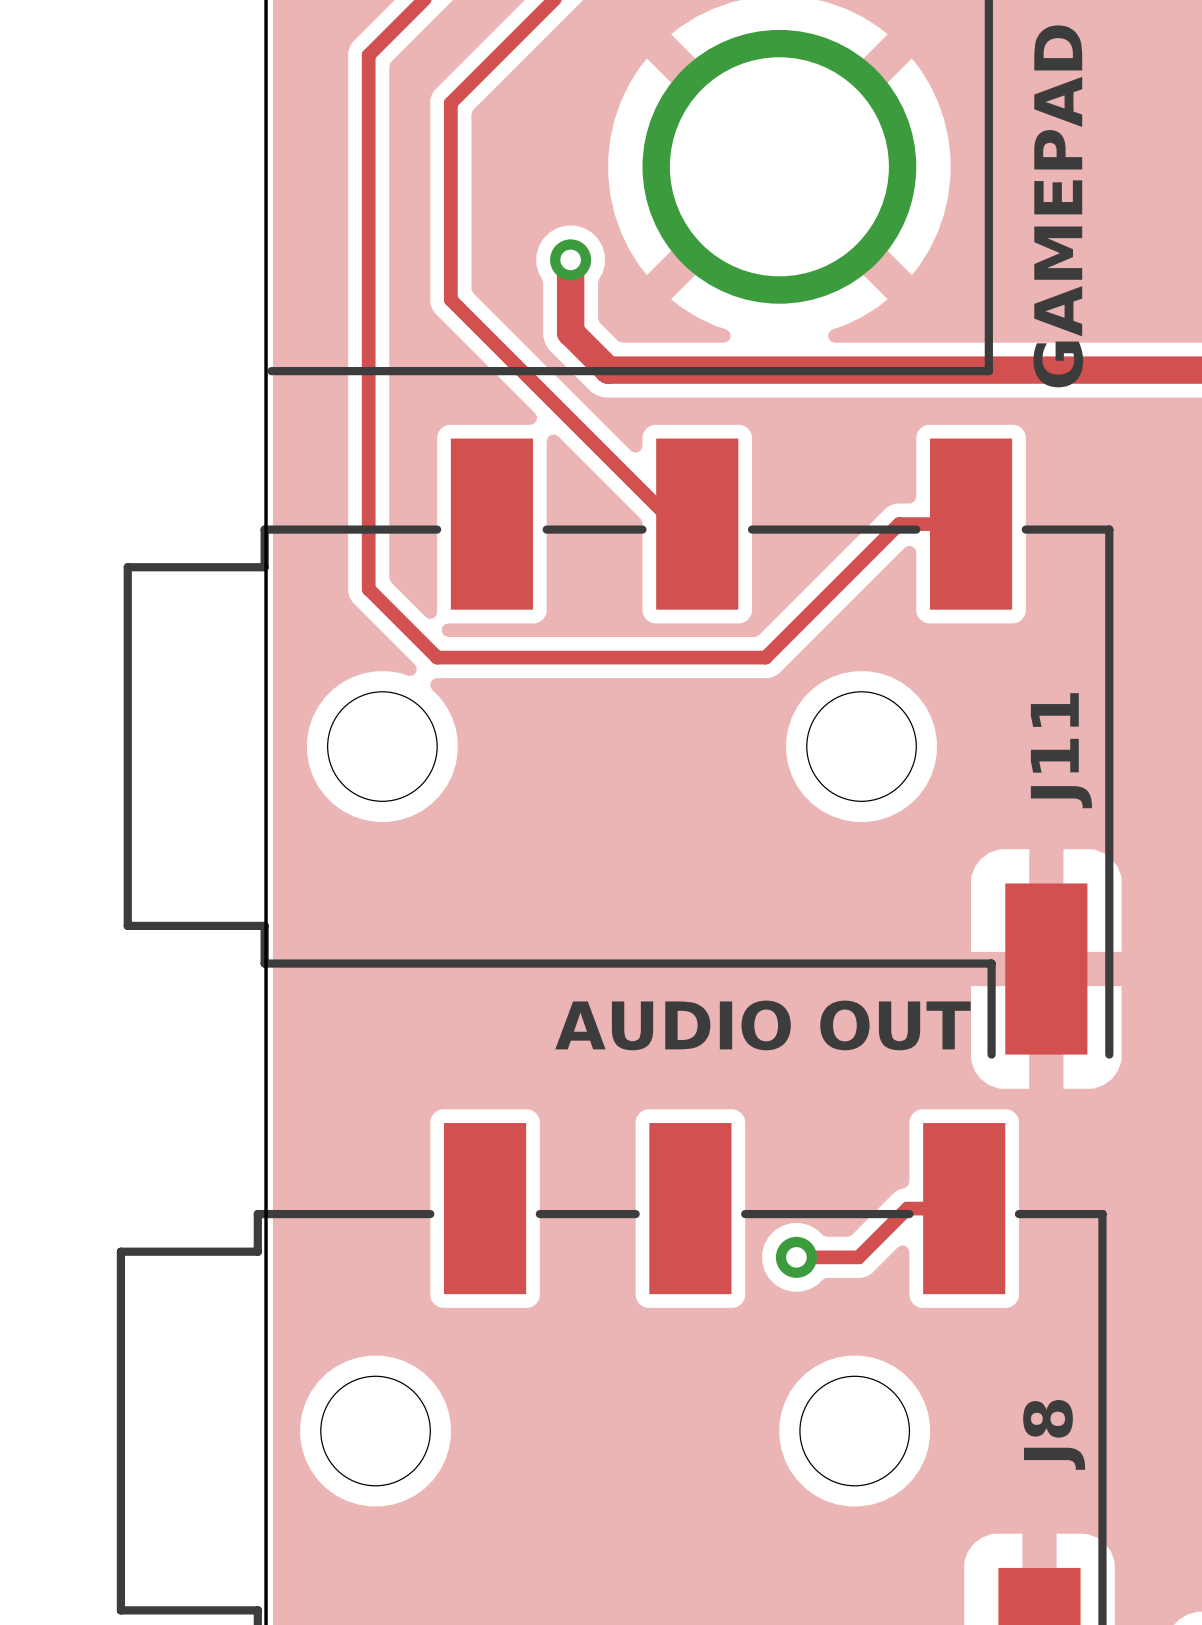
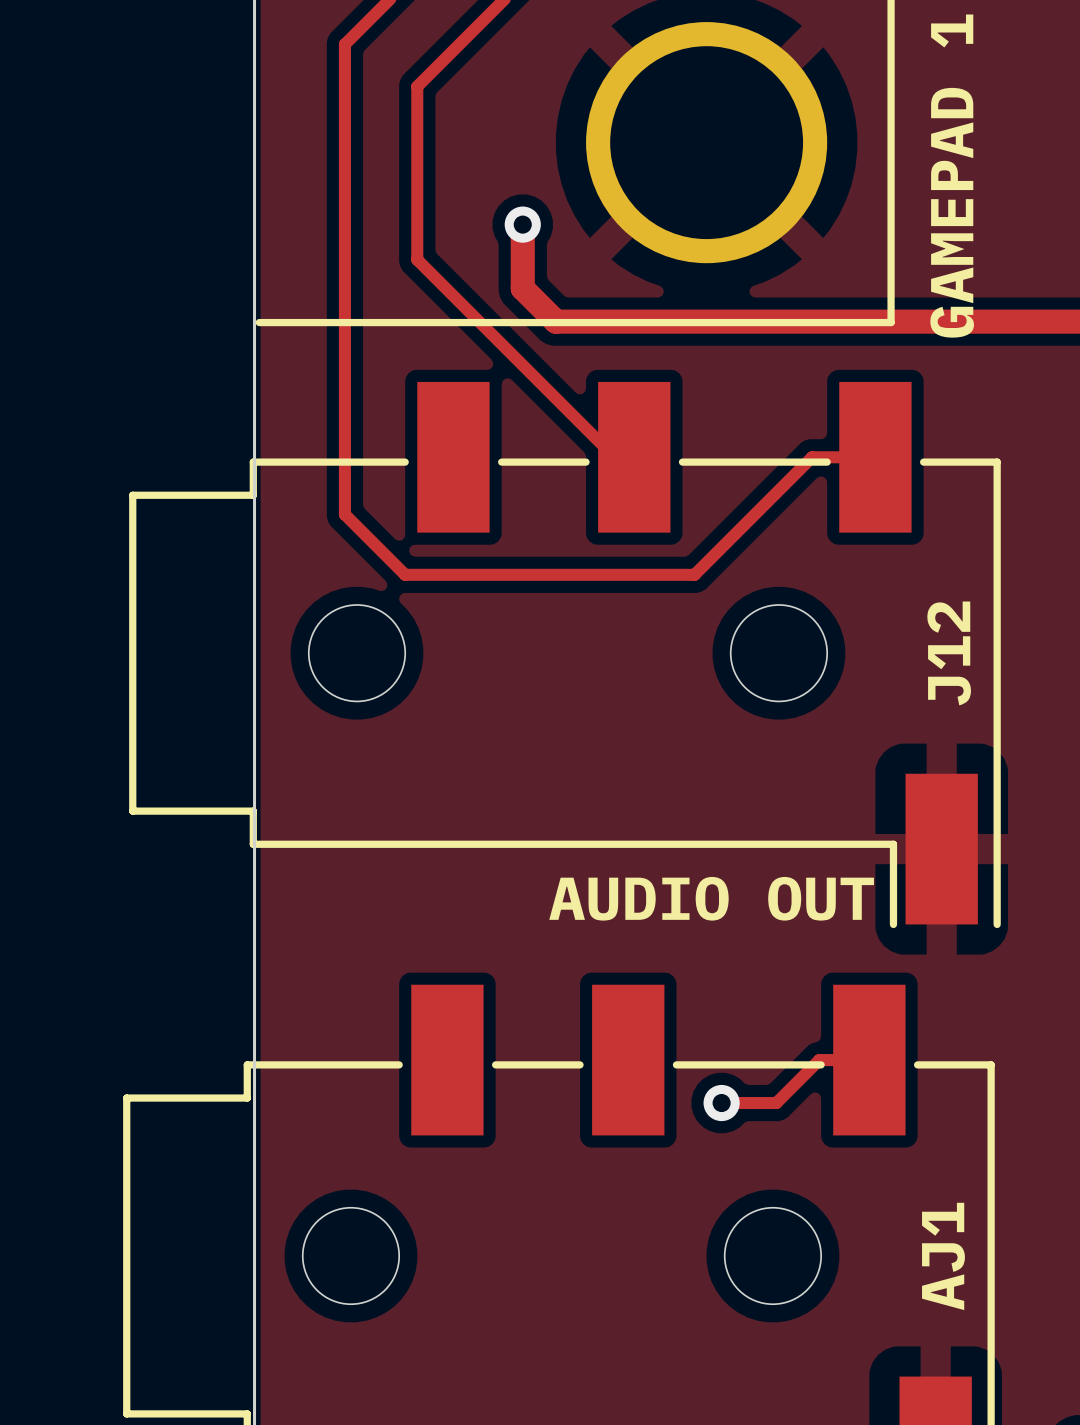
J11 name: J11 (1061, 750) -> J12 (949, 653)
J8 name: J8 (1054, 1434) -> AJ1 (943, 1256)

